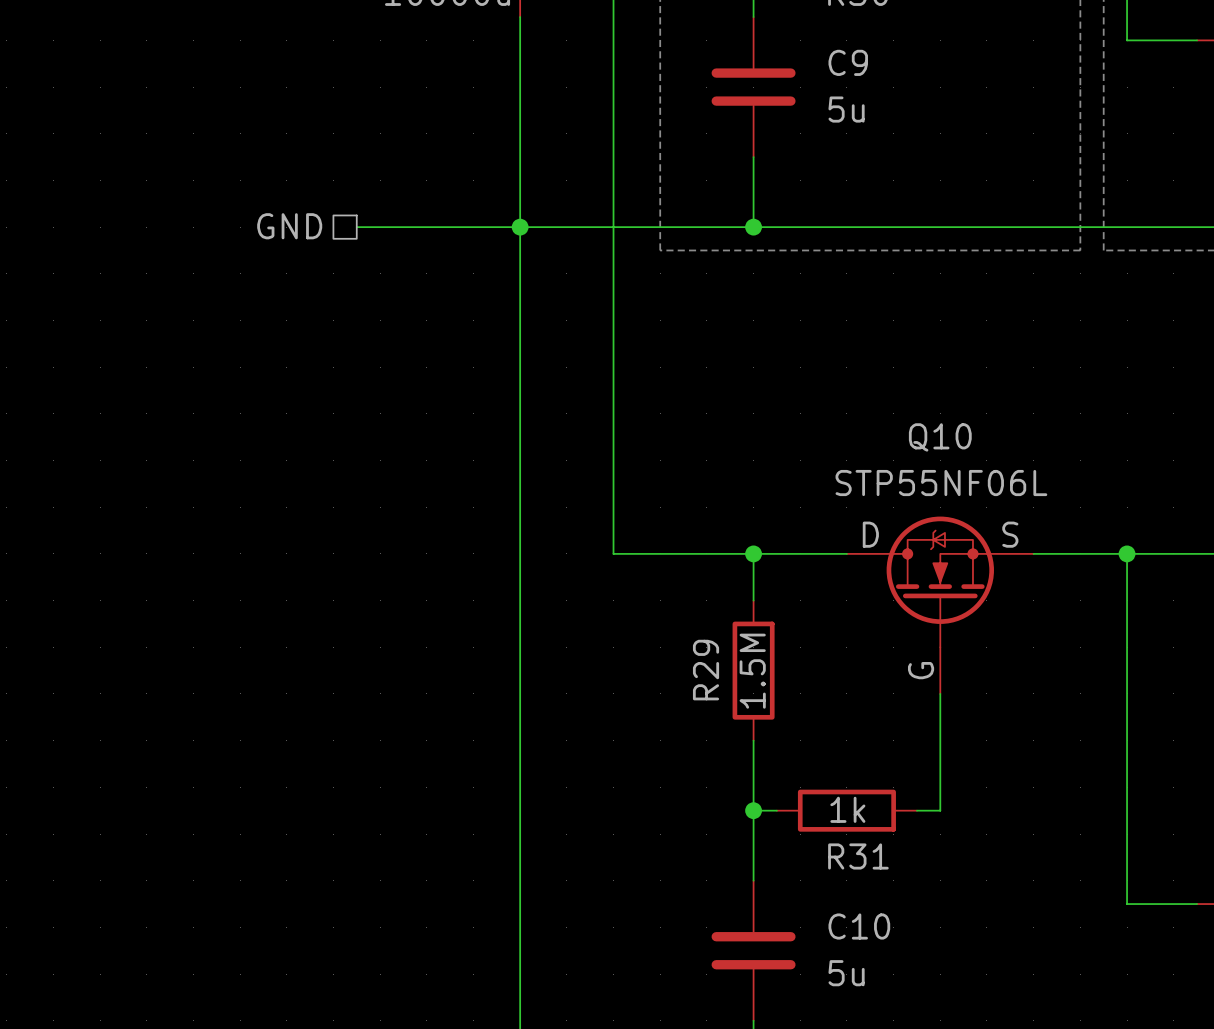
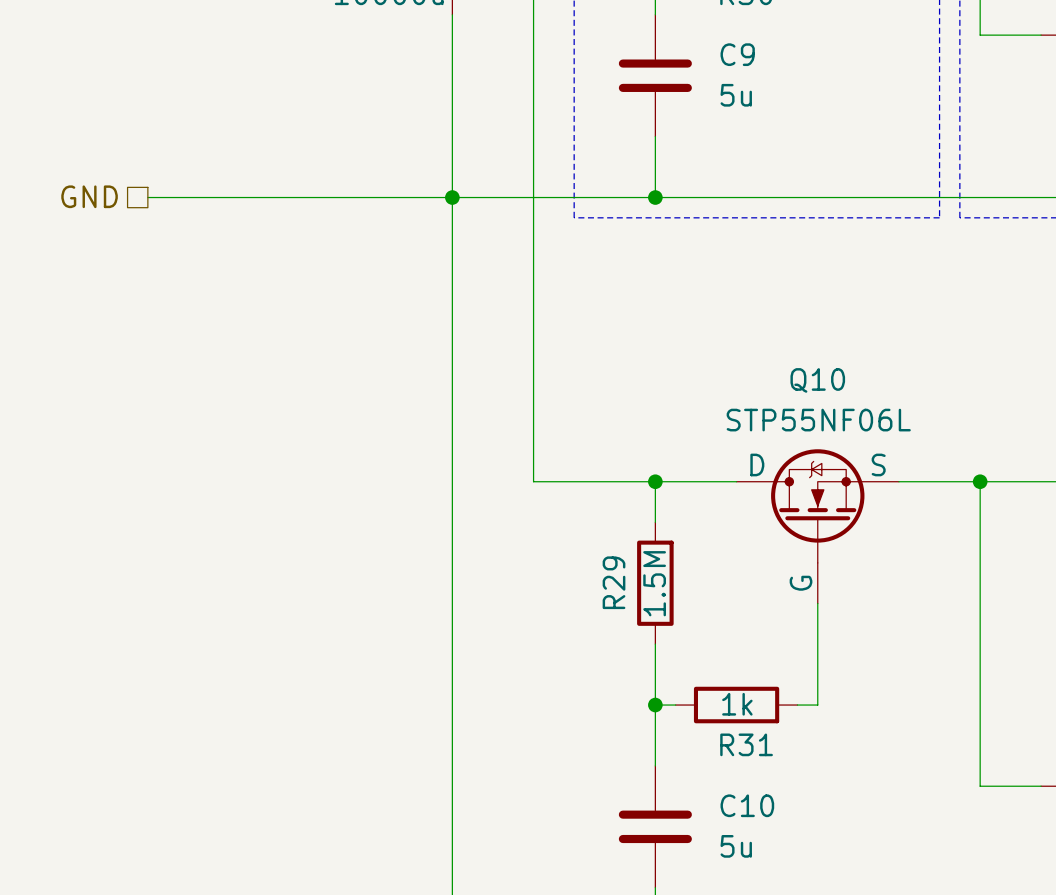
hierarchical label position: GND (289, 226) -> GND (89, 196)
wire: none -> (147, 197) (310, 197)

